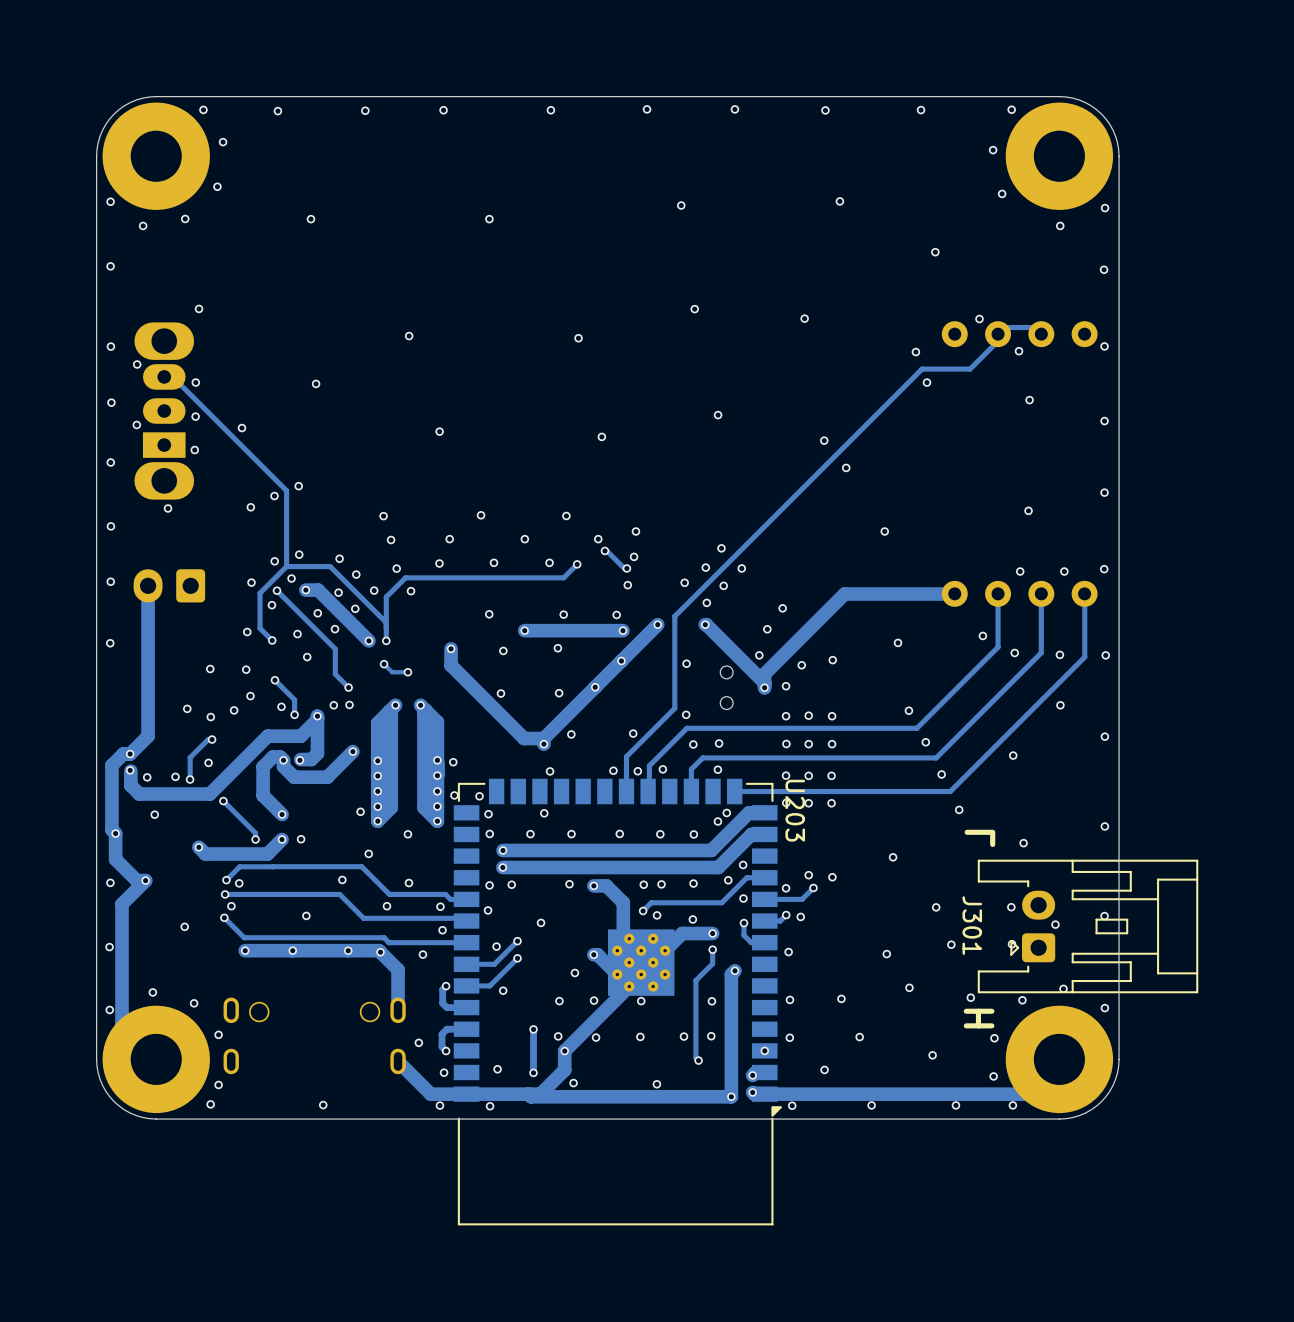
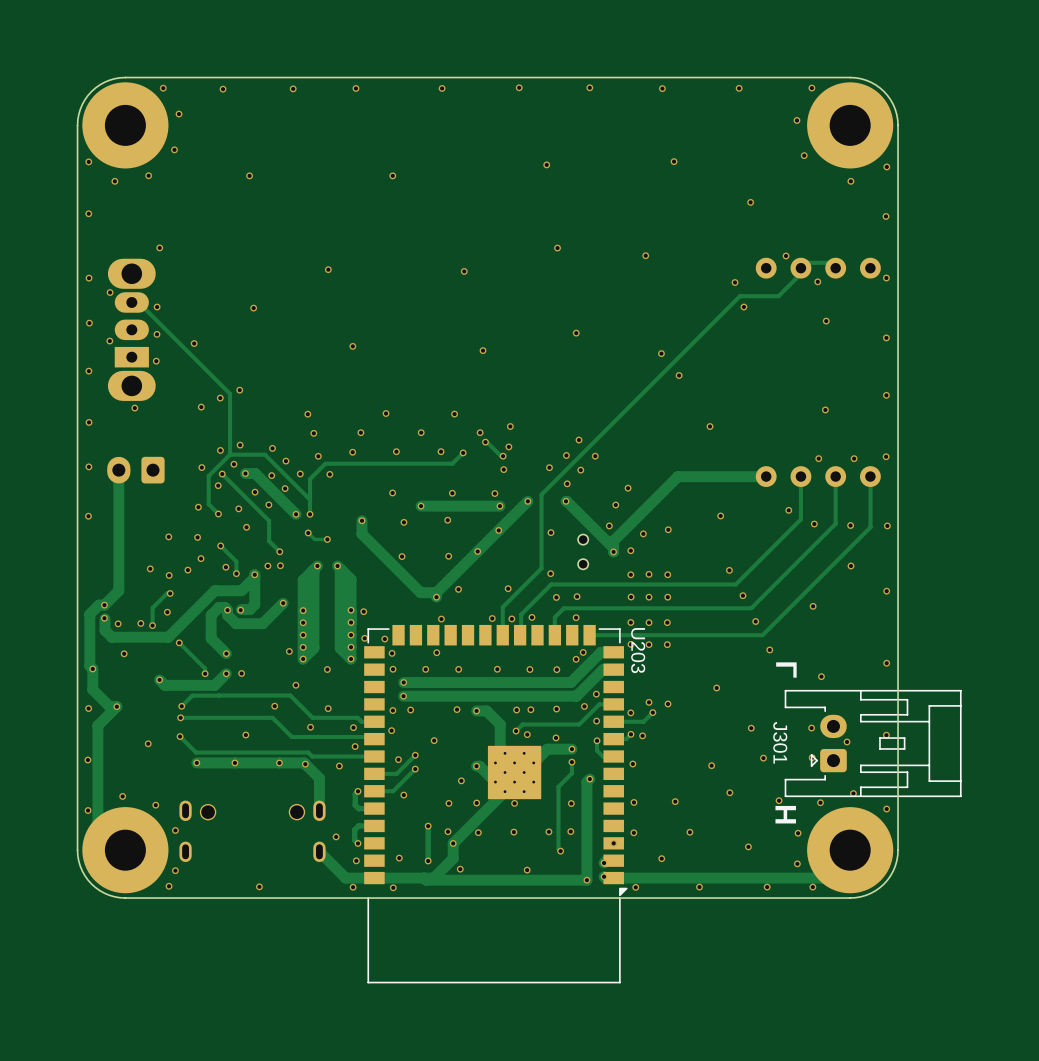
via: (239, 883) -> none
via: (231, 906) -> none

